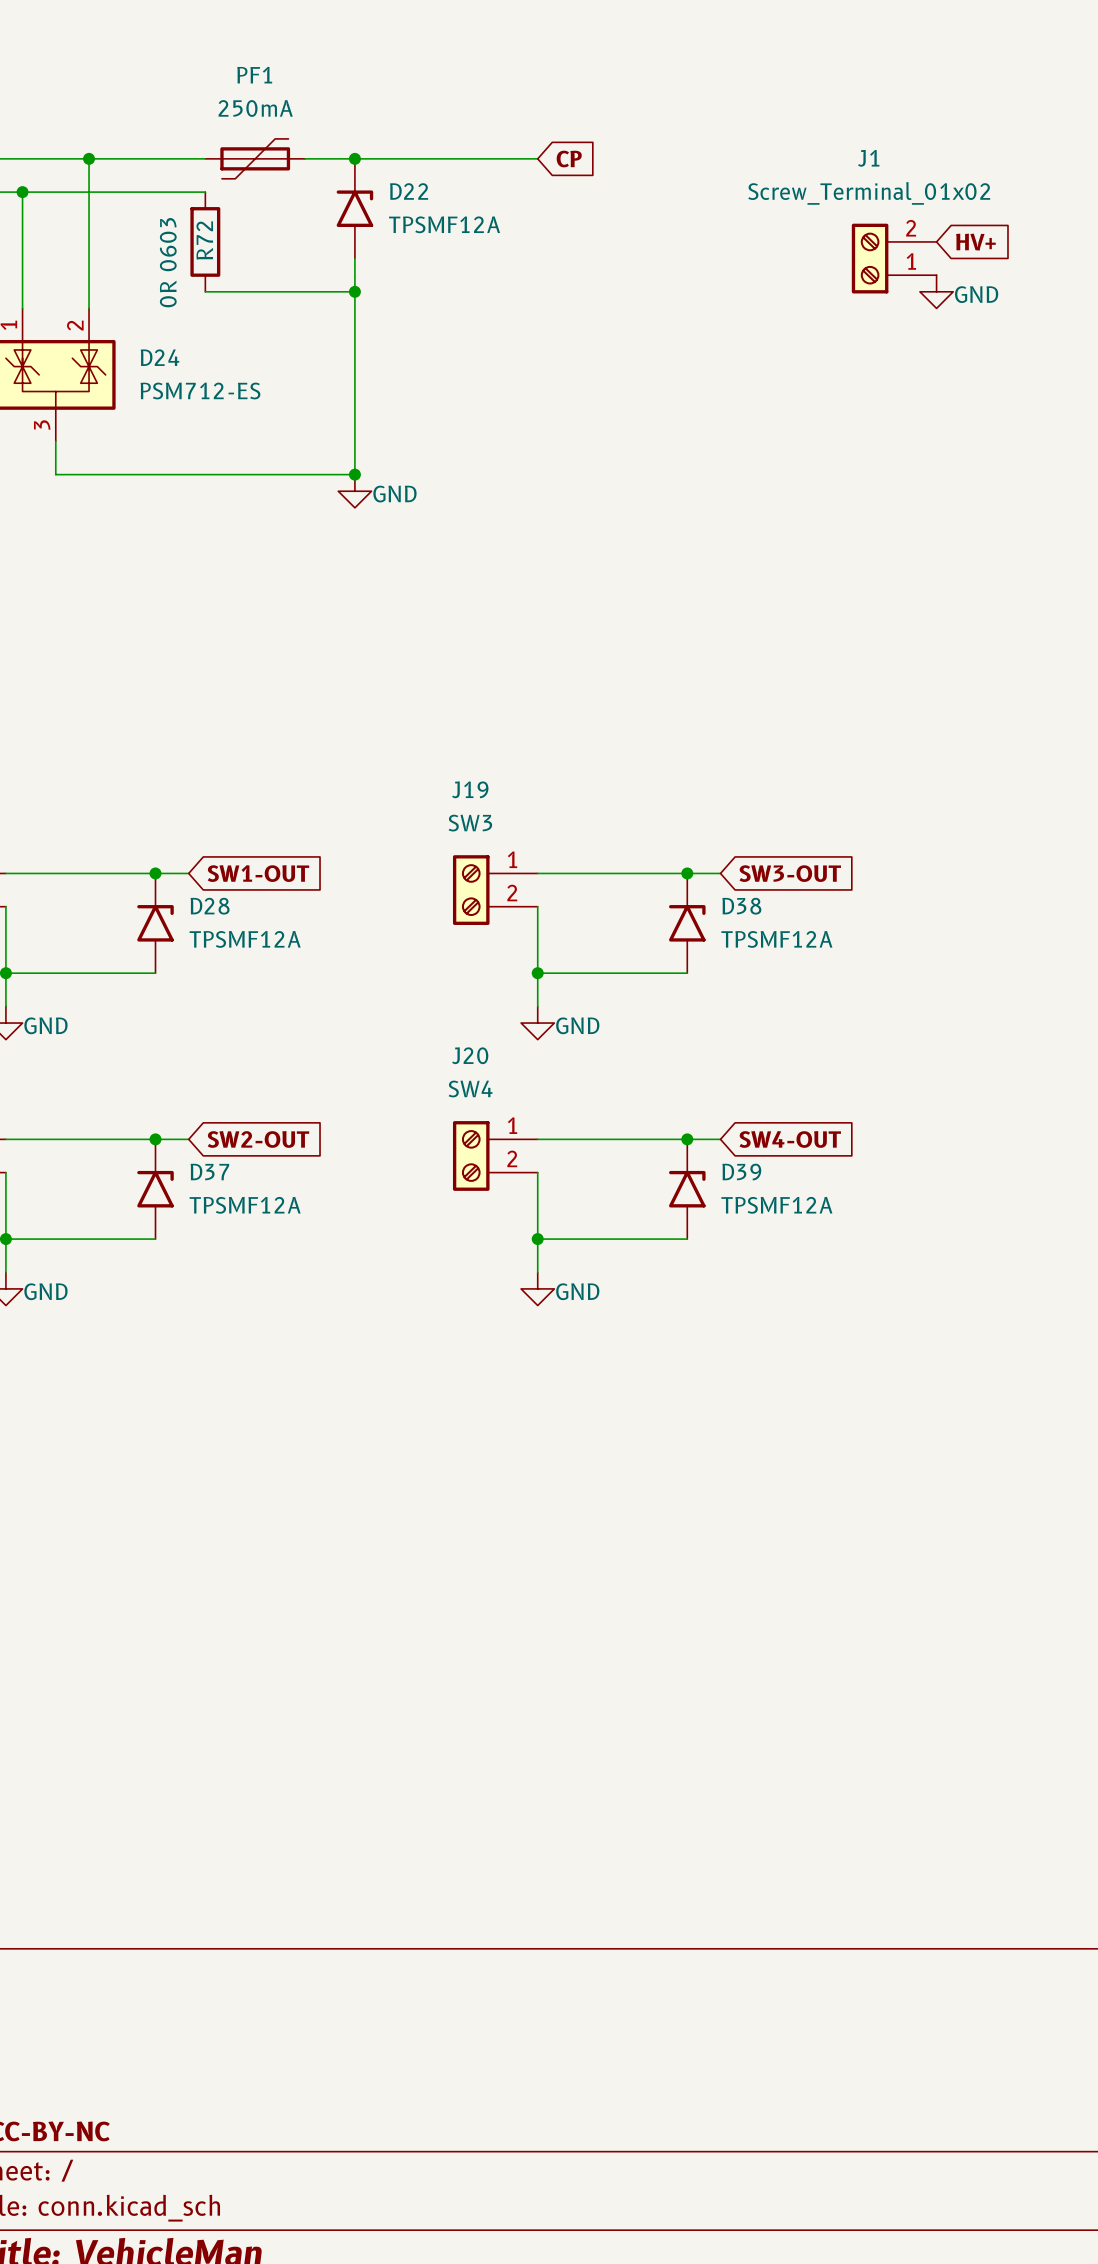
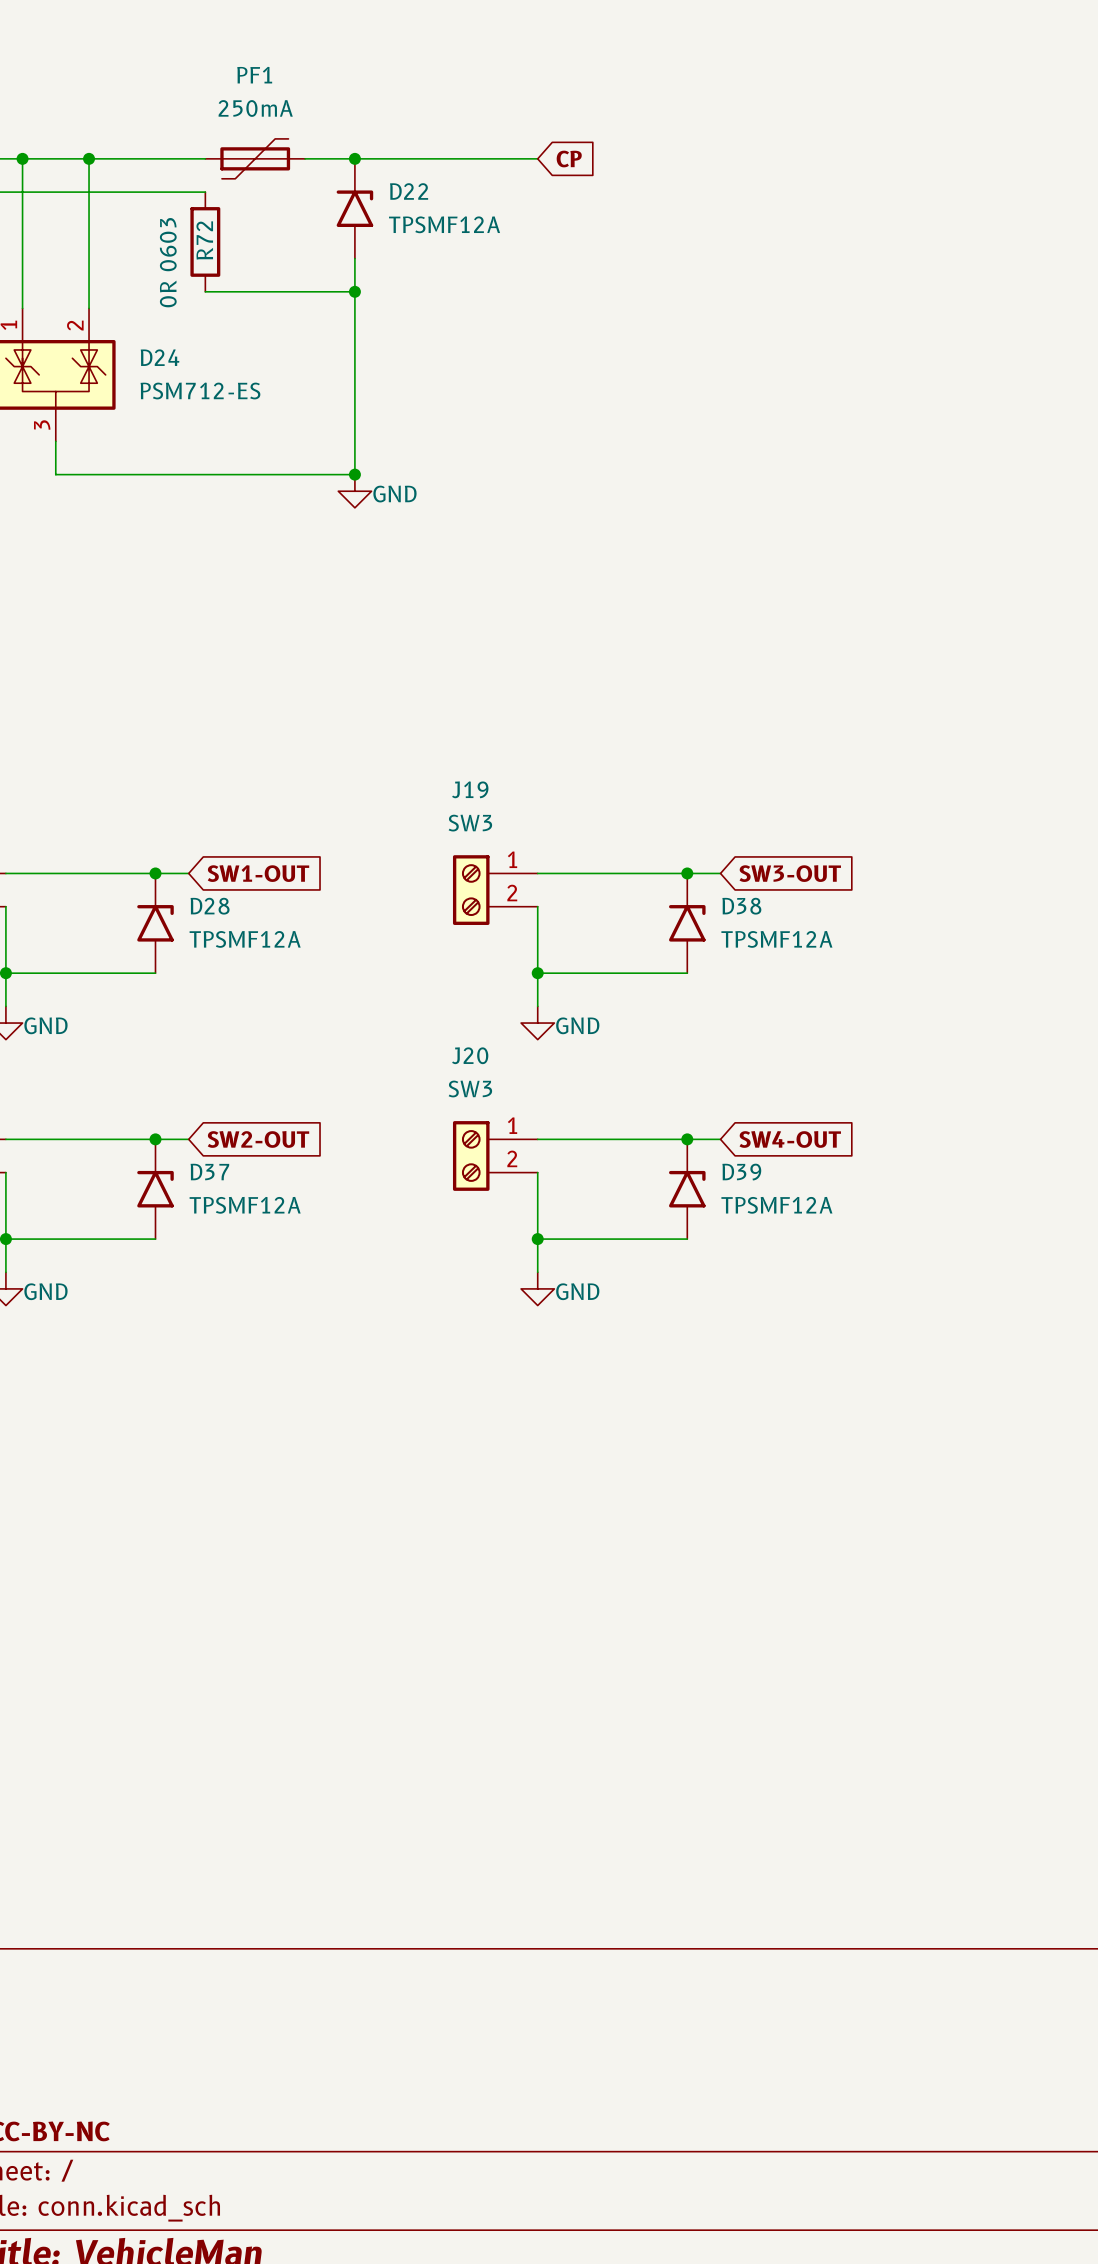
wire: none -> (22, 158) (22, 192)
junction position: (22, 192) -> (22, 158)
global label: HV+ (975, 242) -> none
J1: Screw_Terminal_01x02 (894, 258) -> none
power symbol: GND (936, 291) -> none
J20 value: SW4 (470, 1088) -> SW3 (470, 1088)

